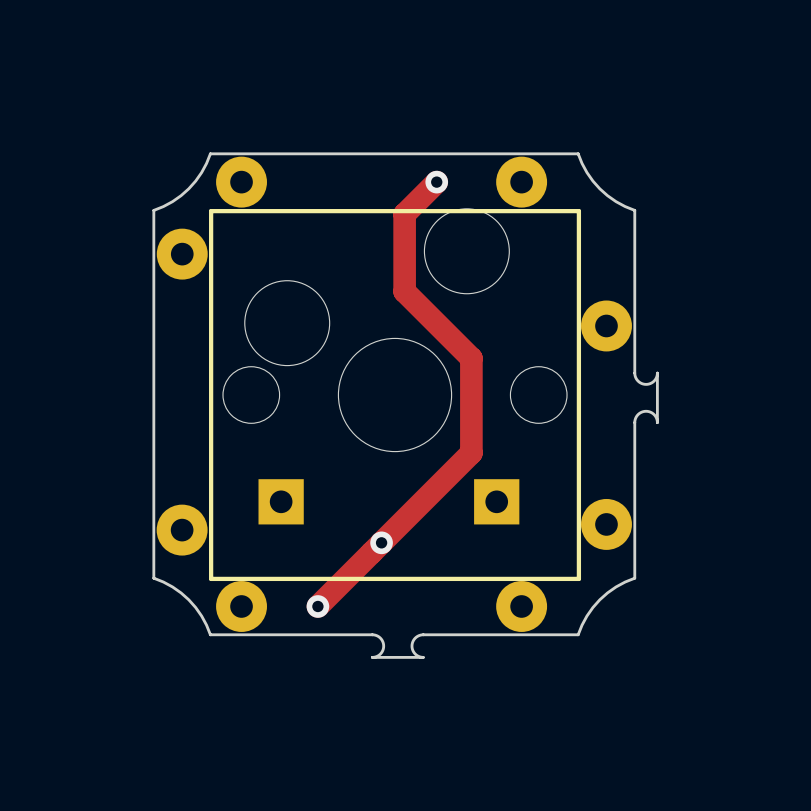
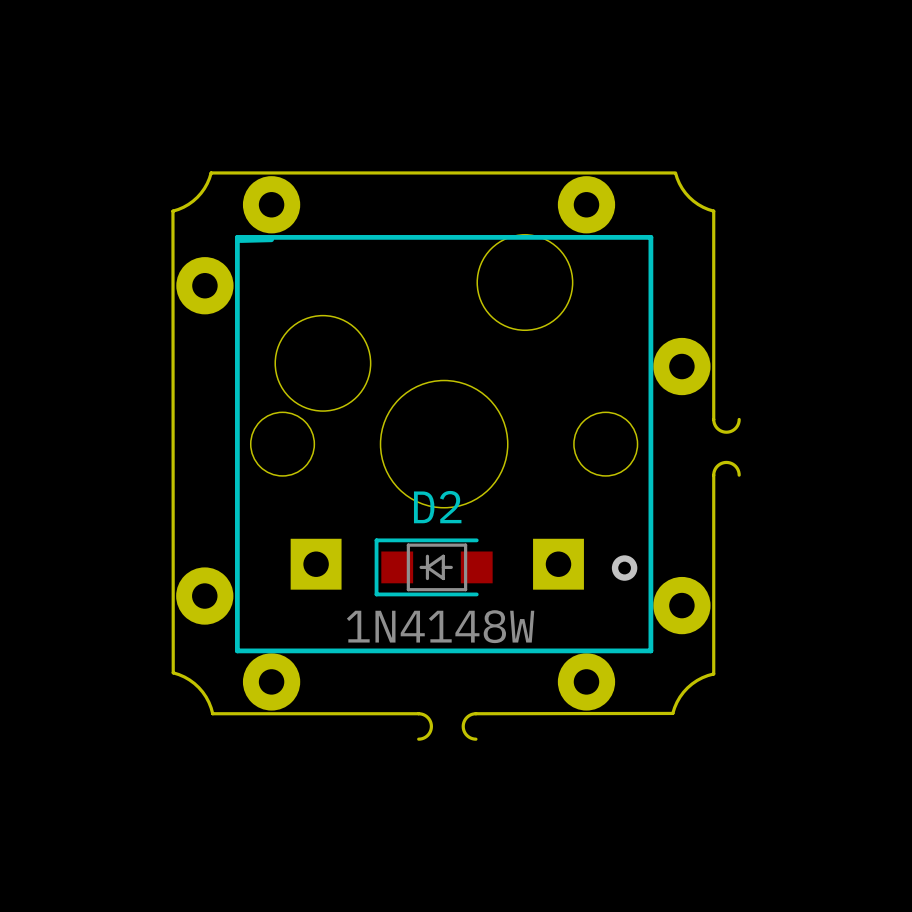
track: (436, 182) (404, 214) (404, 291) (471, 358) (471, 453) (317, 606) -> none
via: (436, 182) -> none
board edge: (634, 210) (616, 201) (599, 188) (586, 172) (578, 153) (210, 153) (201, 172) (188, 188) (172, 201) (153, 210) (153, 578) -> (713, 236) (713, 211) (698, 204) (689, 197) (679, 183) (675, 172)
line: none -> (271, 239) (240, 240)
board edge: (657, 373) (657, 422) -> none
D2: none -> 1N4148W (433, 567)
via: none -> (624, 568)
part position: (606, 524) -> (681, 605)
via: (381, 542) -> none
board edge: (153, 578) (172, 586) (188, 599) (201, 616) (210, 634) -> (673, 172) (211, 172) (204, 188) (197, 197) (183, 207) (172, 211) (173, 672) (189, 679) (198, 687) (206, 697) (212, 713) (236, 713)
board edge: (634, 578) (616, 586) (599, 599) (586, 616) (578, 634) (423, 634) -> (713, 650) (713, 673) (697, 680) (687, 687) (677, 702) (672, 713) (475, 713)
via: (317, 606) -> none
board edge: (423, 657) (372, 657) -> none

